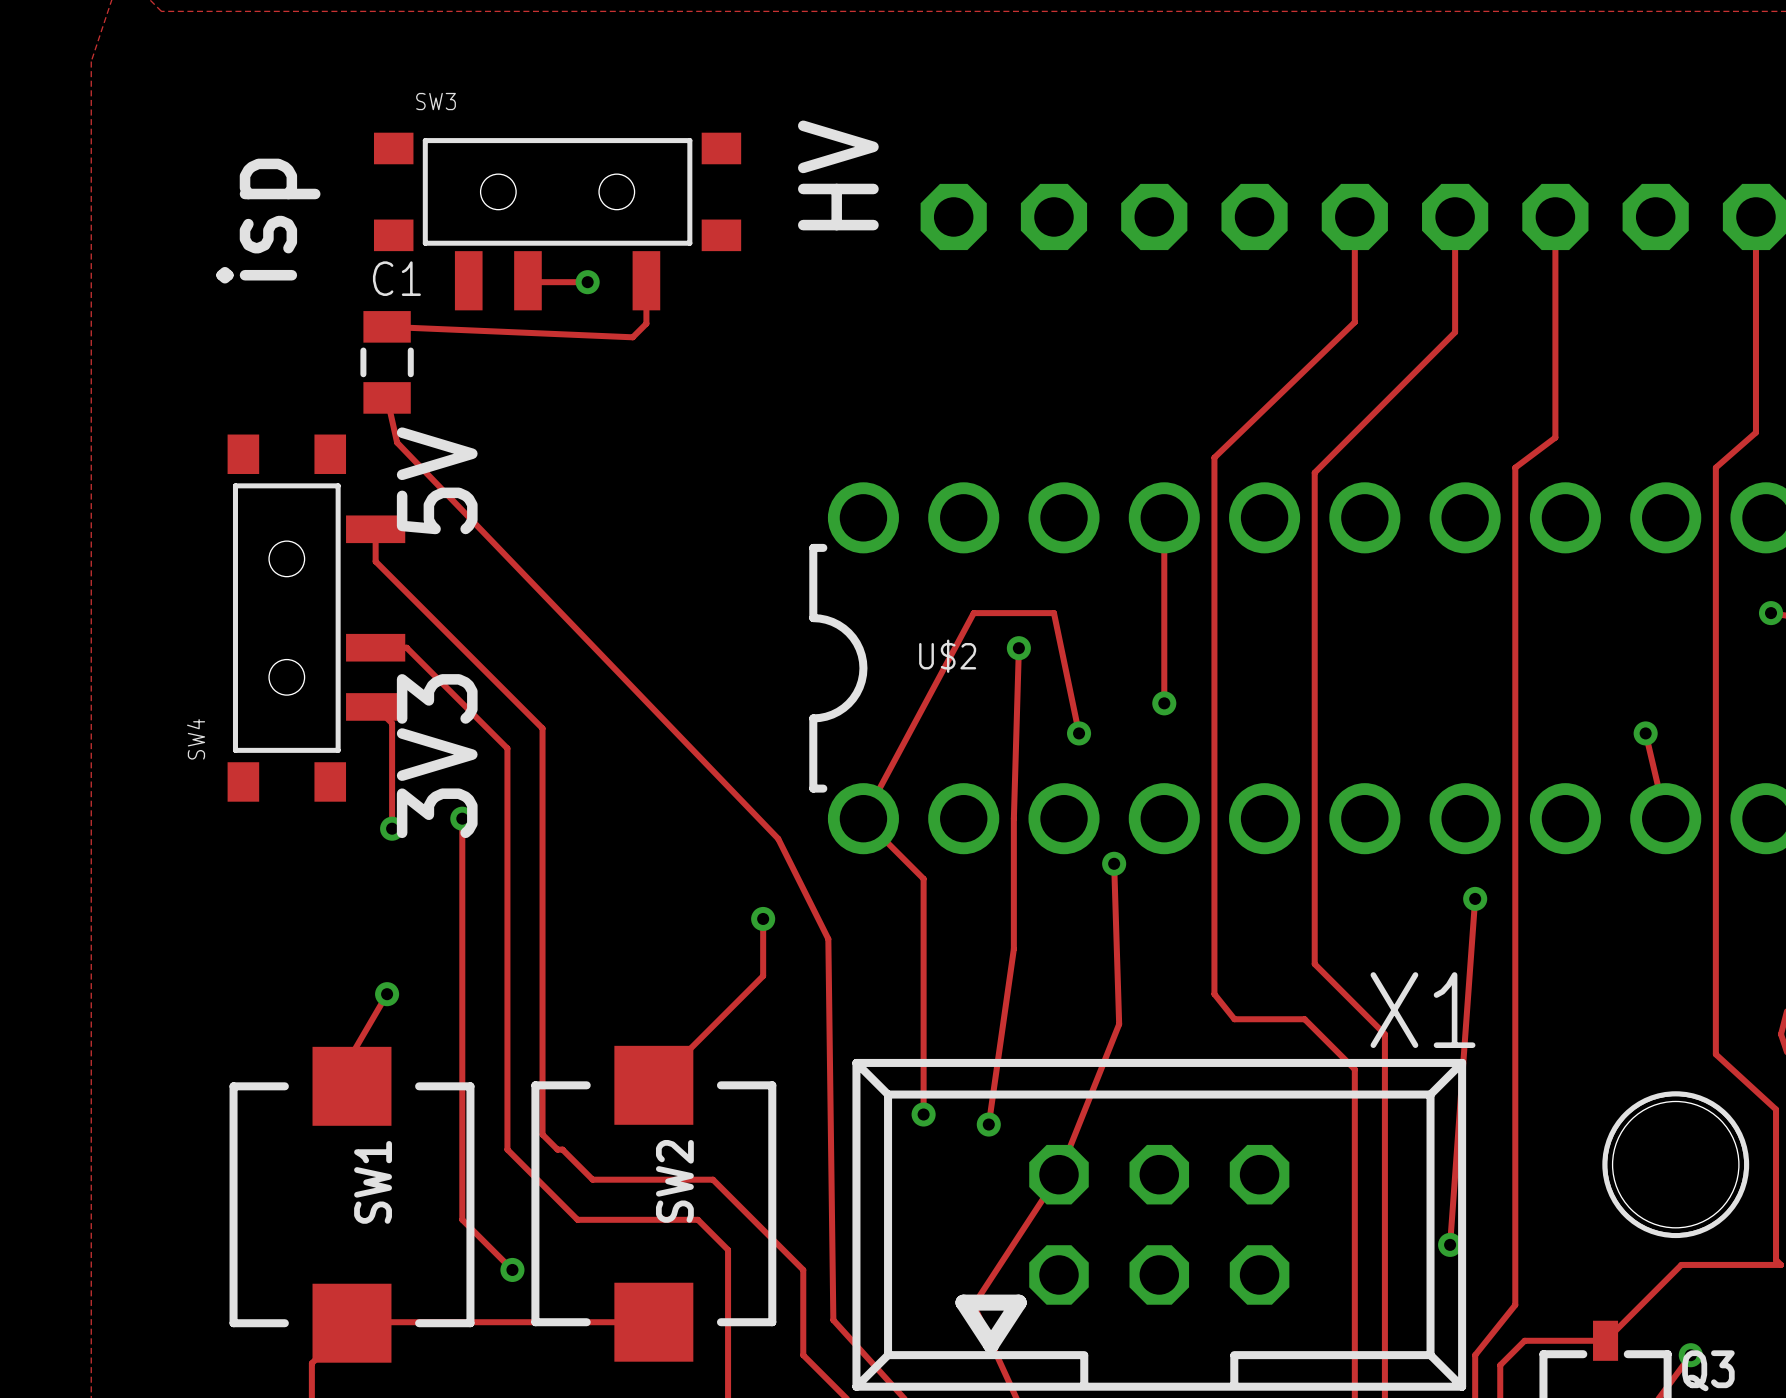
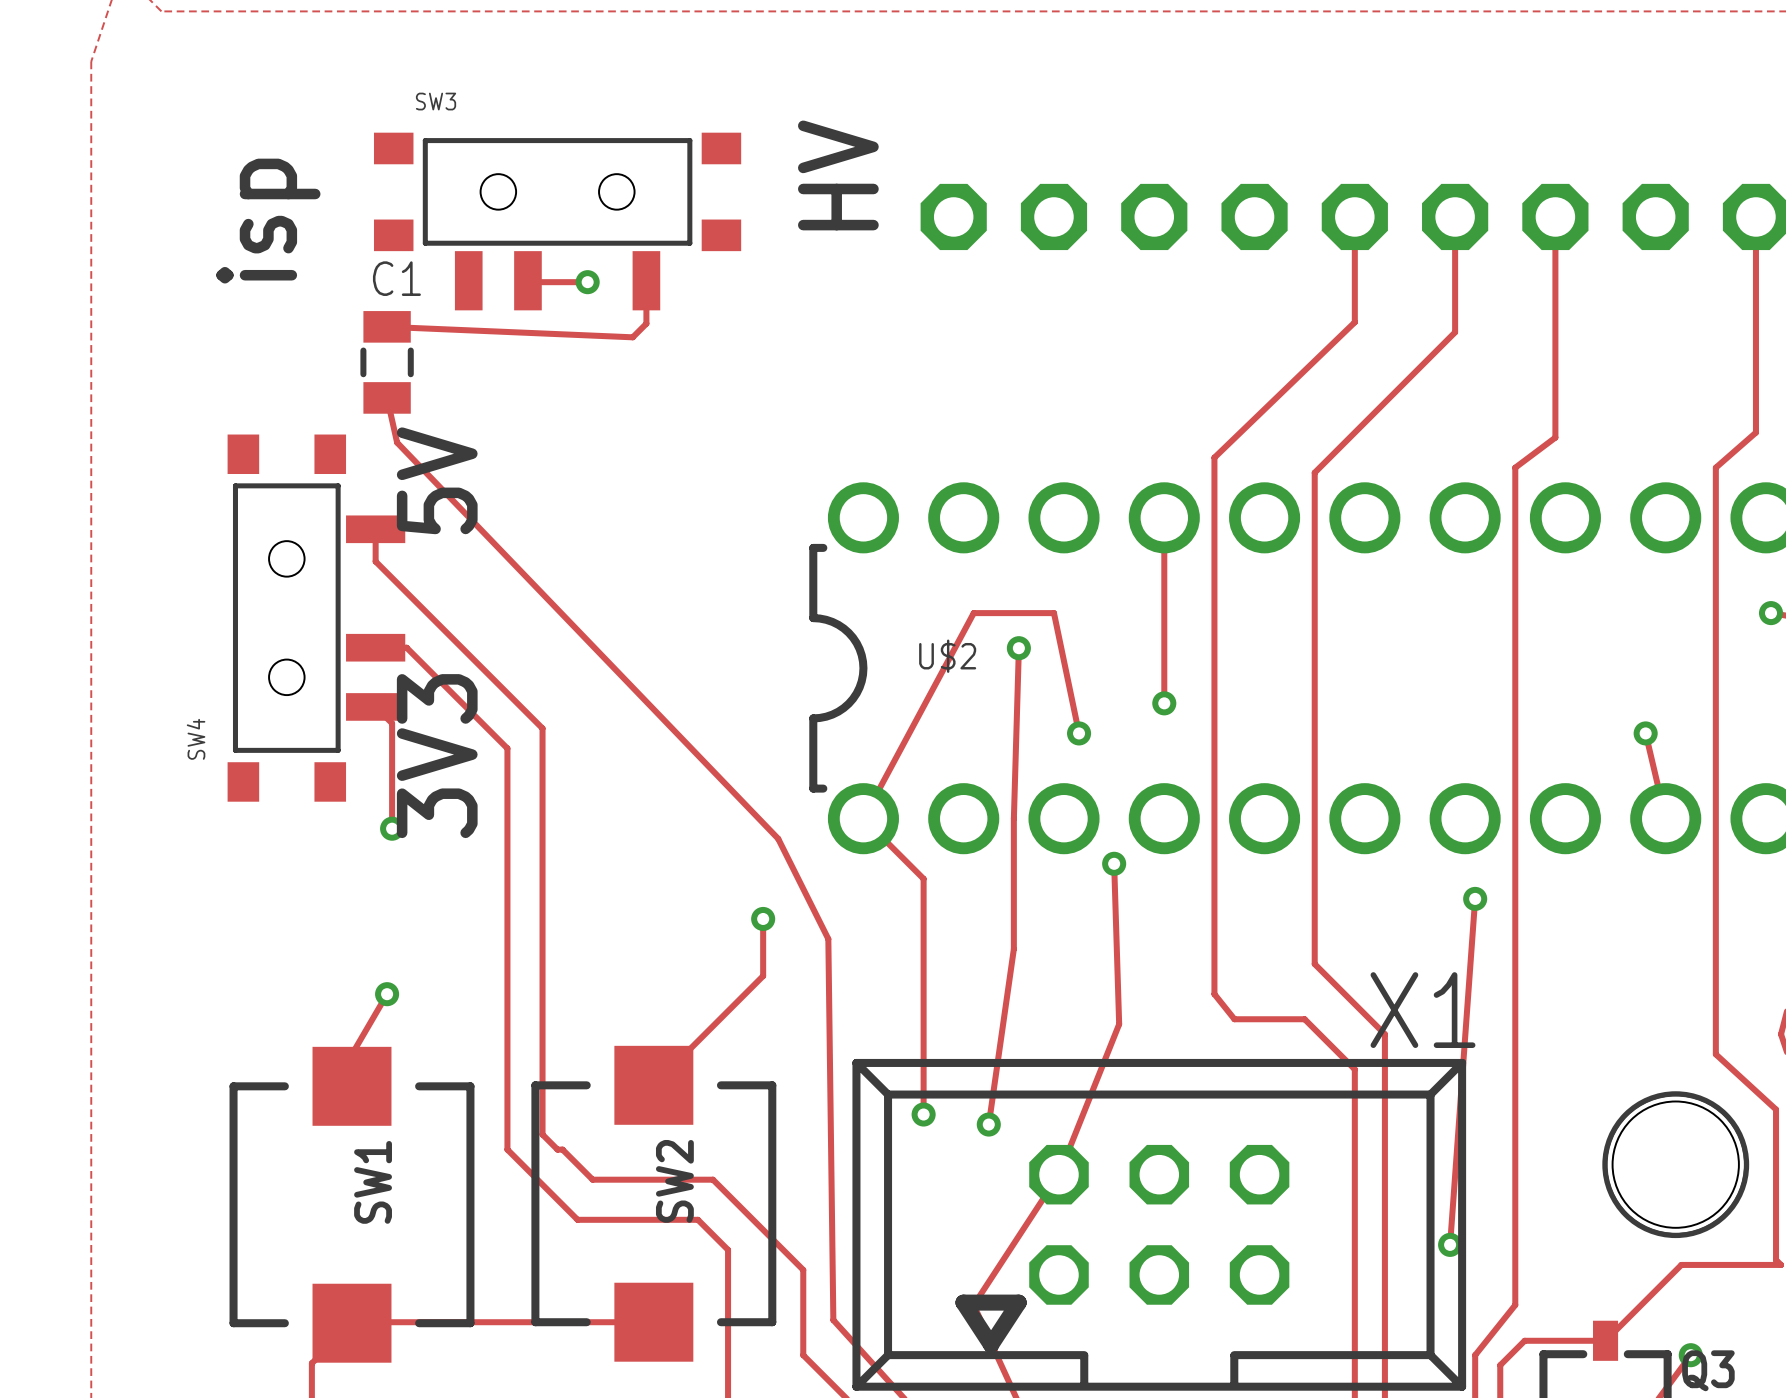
track: (462, 818) (462, 1219) (512, 1269) -> none
via: (462, 818) -> none
via: (512, 1269) -> none

